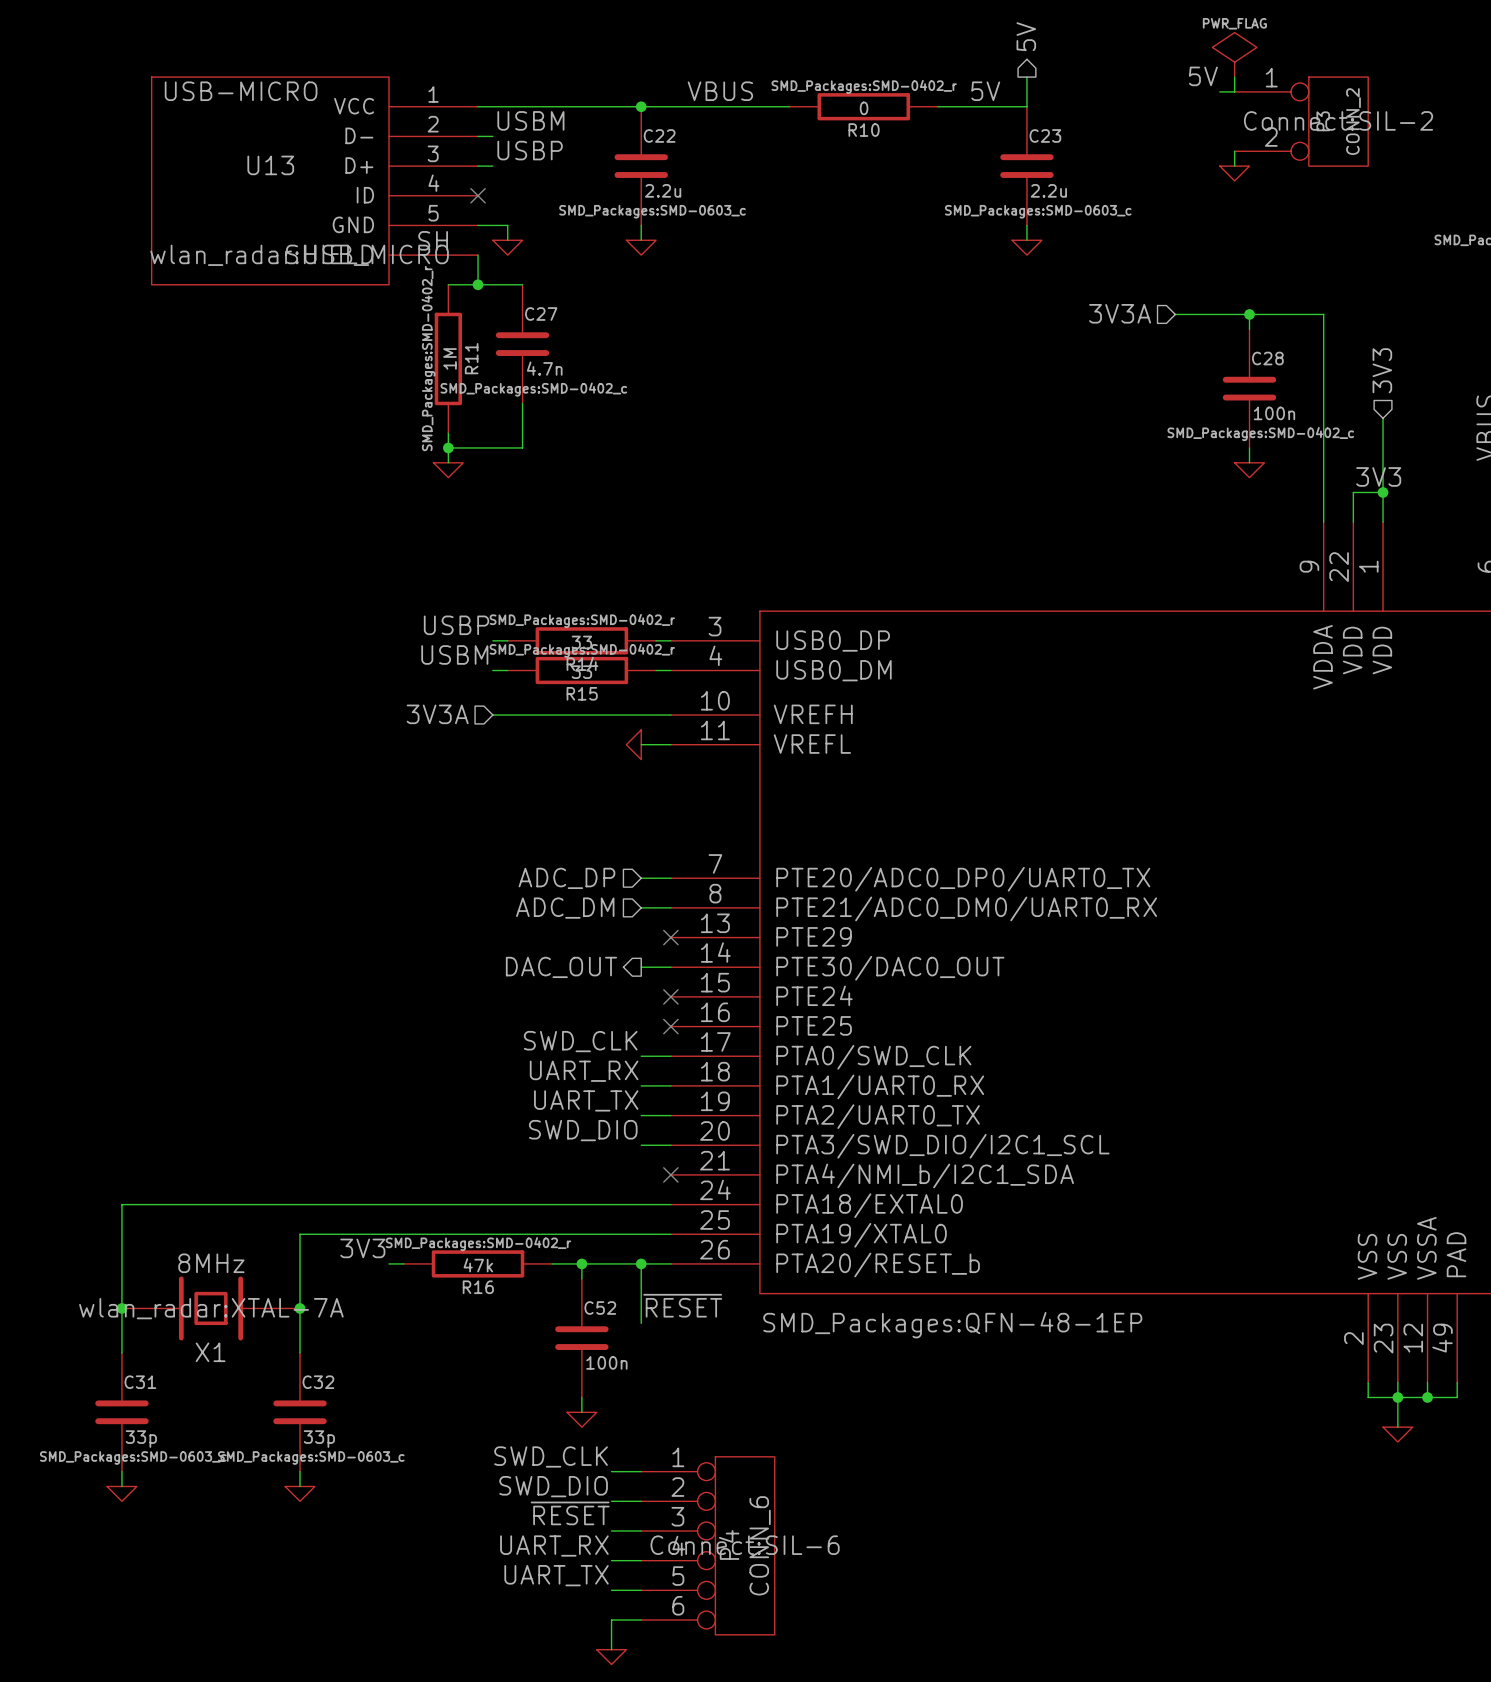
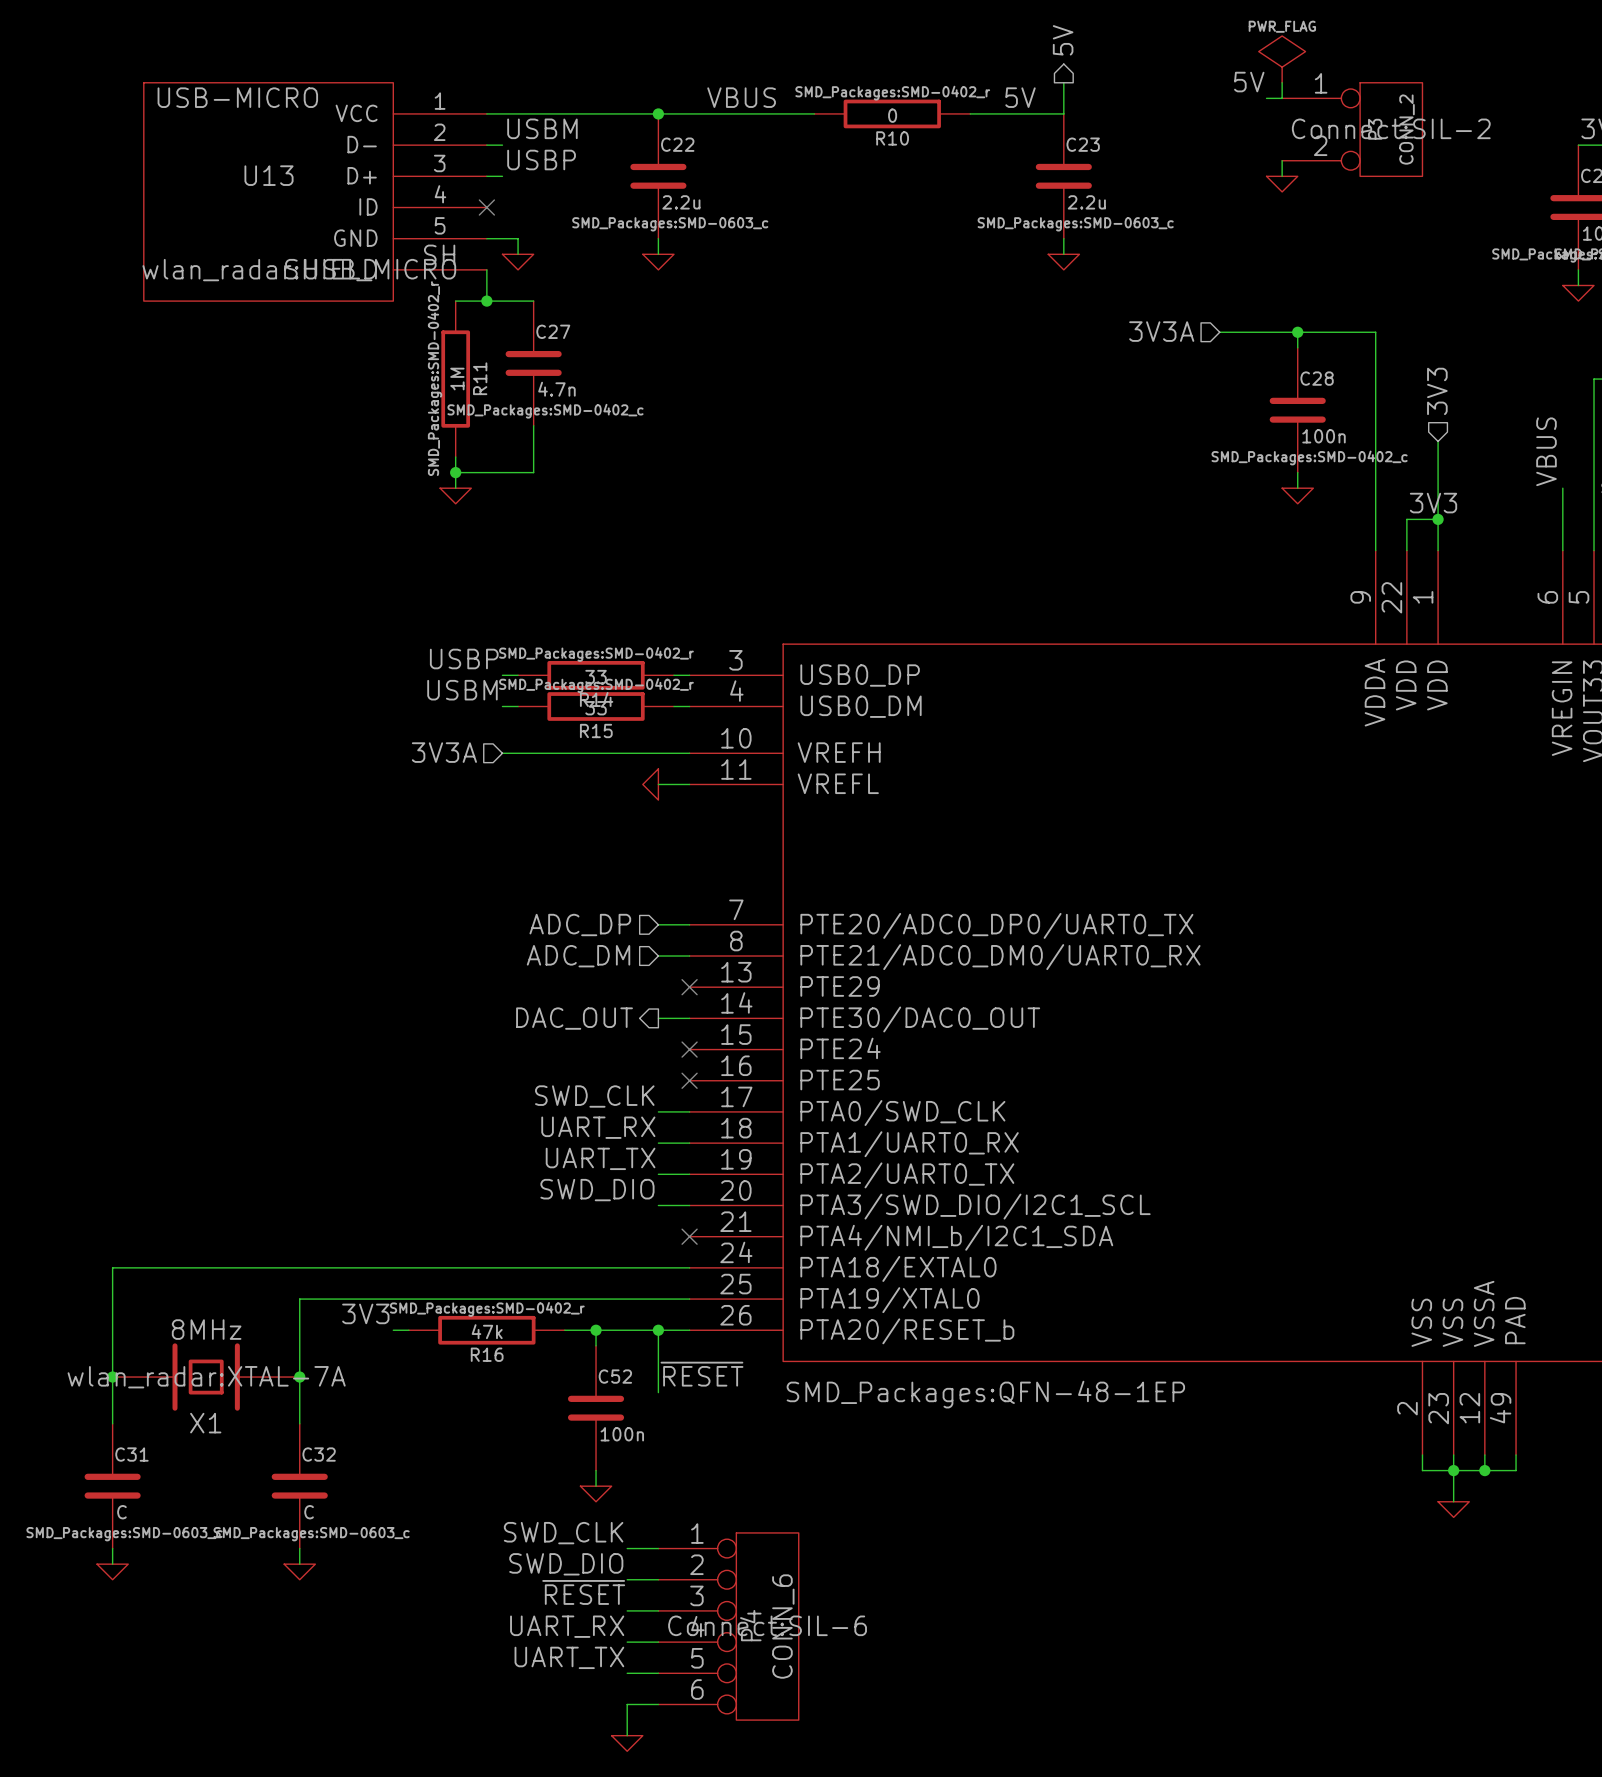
C31 value: 33p (141, 1439) -> C (121, 1512)
C32 value: 33p (319, 1439) -> C (309, 1512)

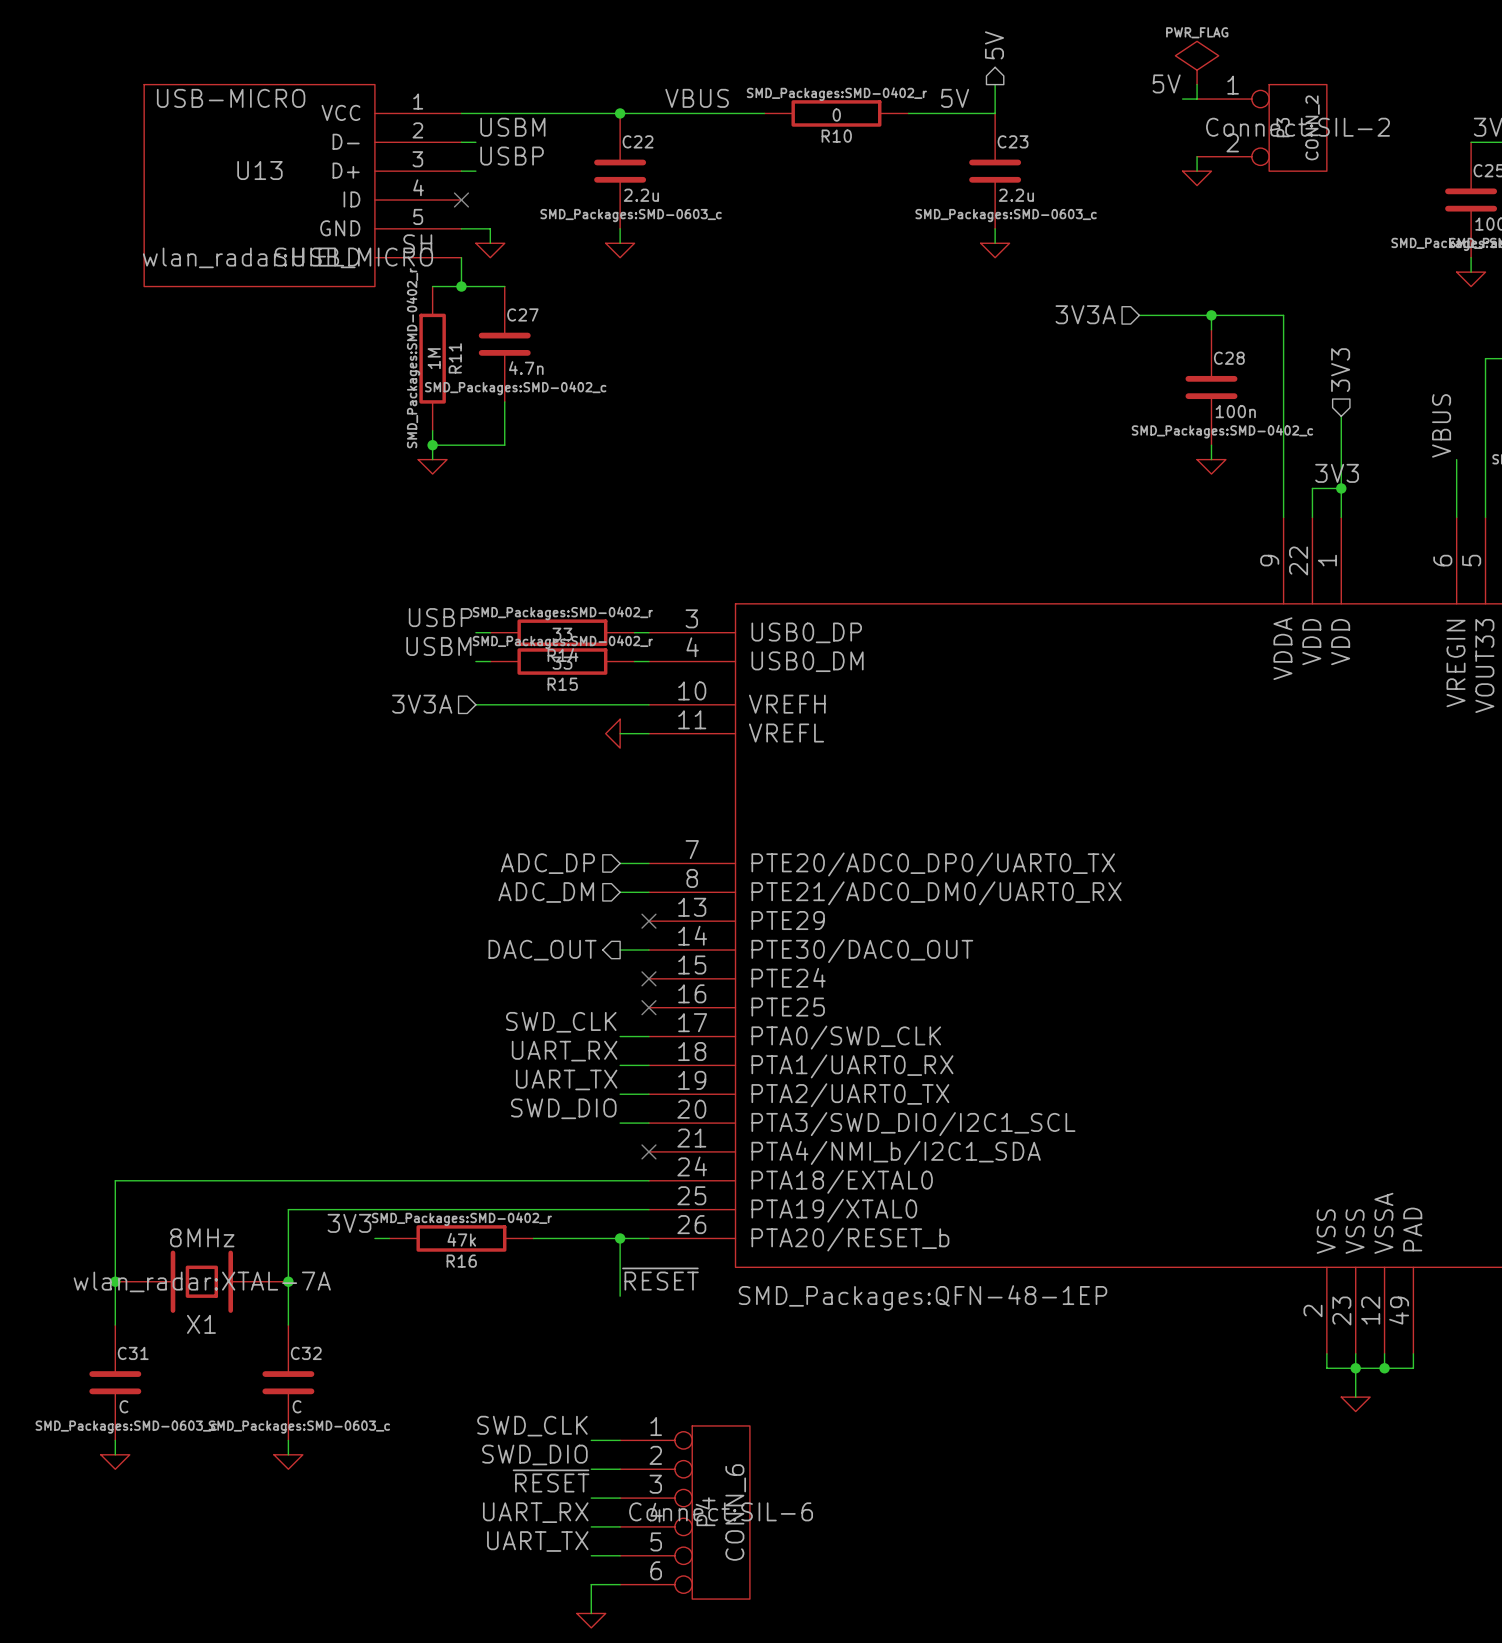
wire: (596, 1330) (596, 1345) -> none
junction: (596, 1330) -> none
C52: 100n (596, 1408) -> none
wire: (596, 1470) (596, 1486) -> none
power symbol: (596, 1493) -> none

